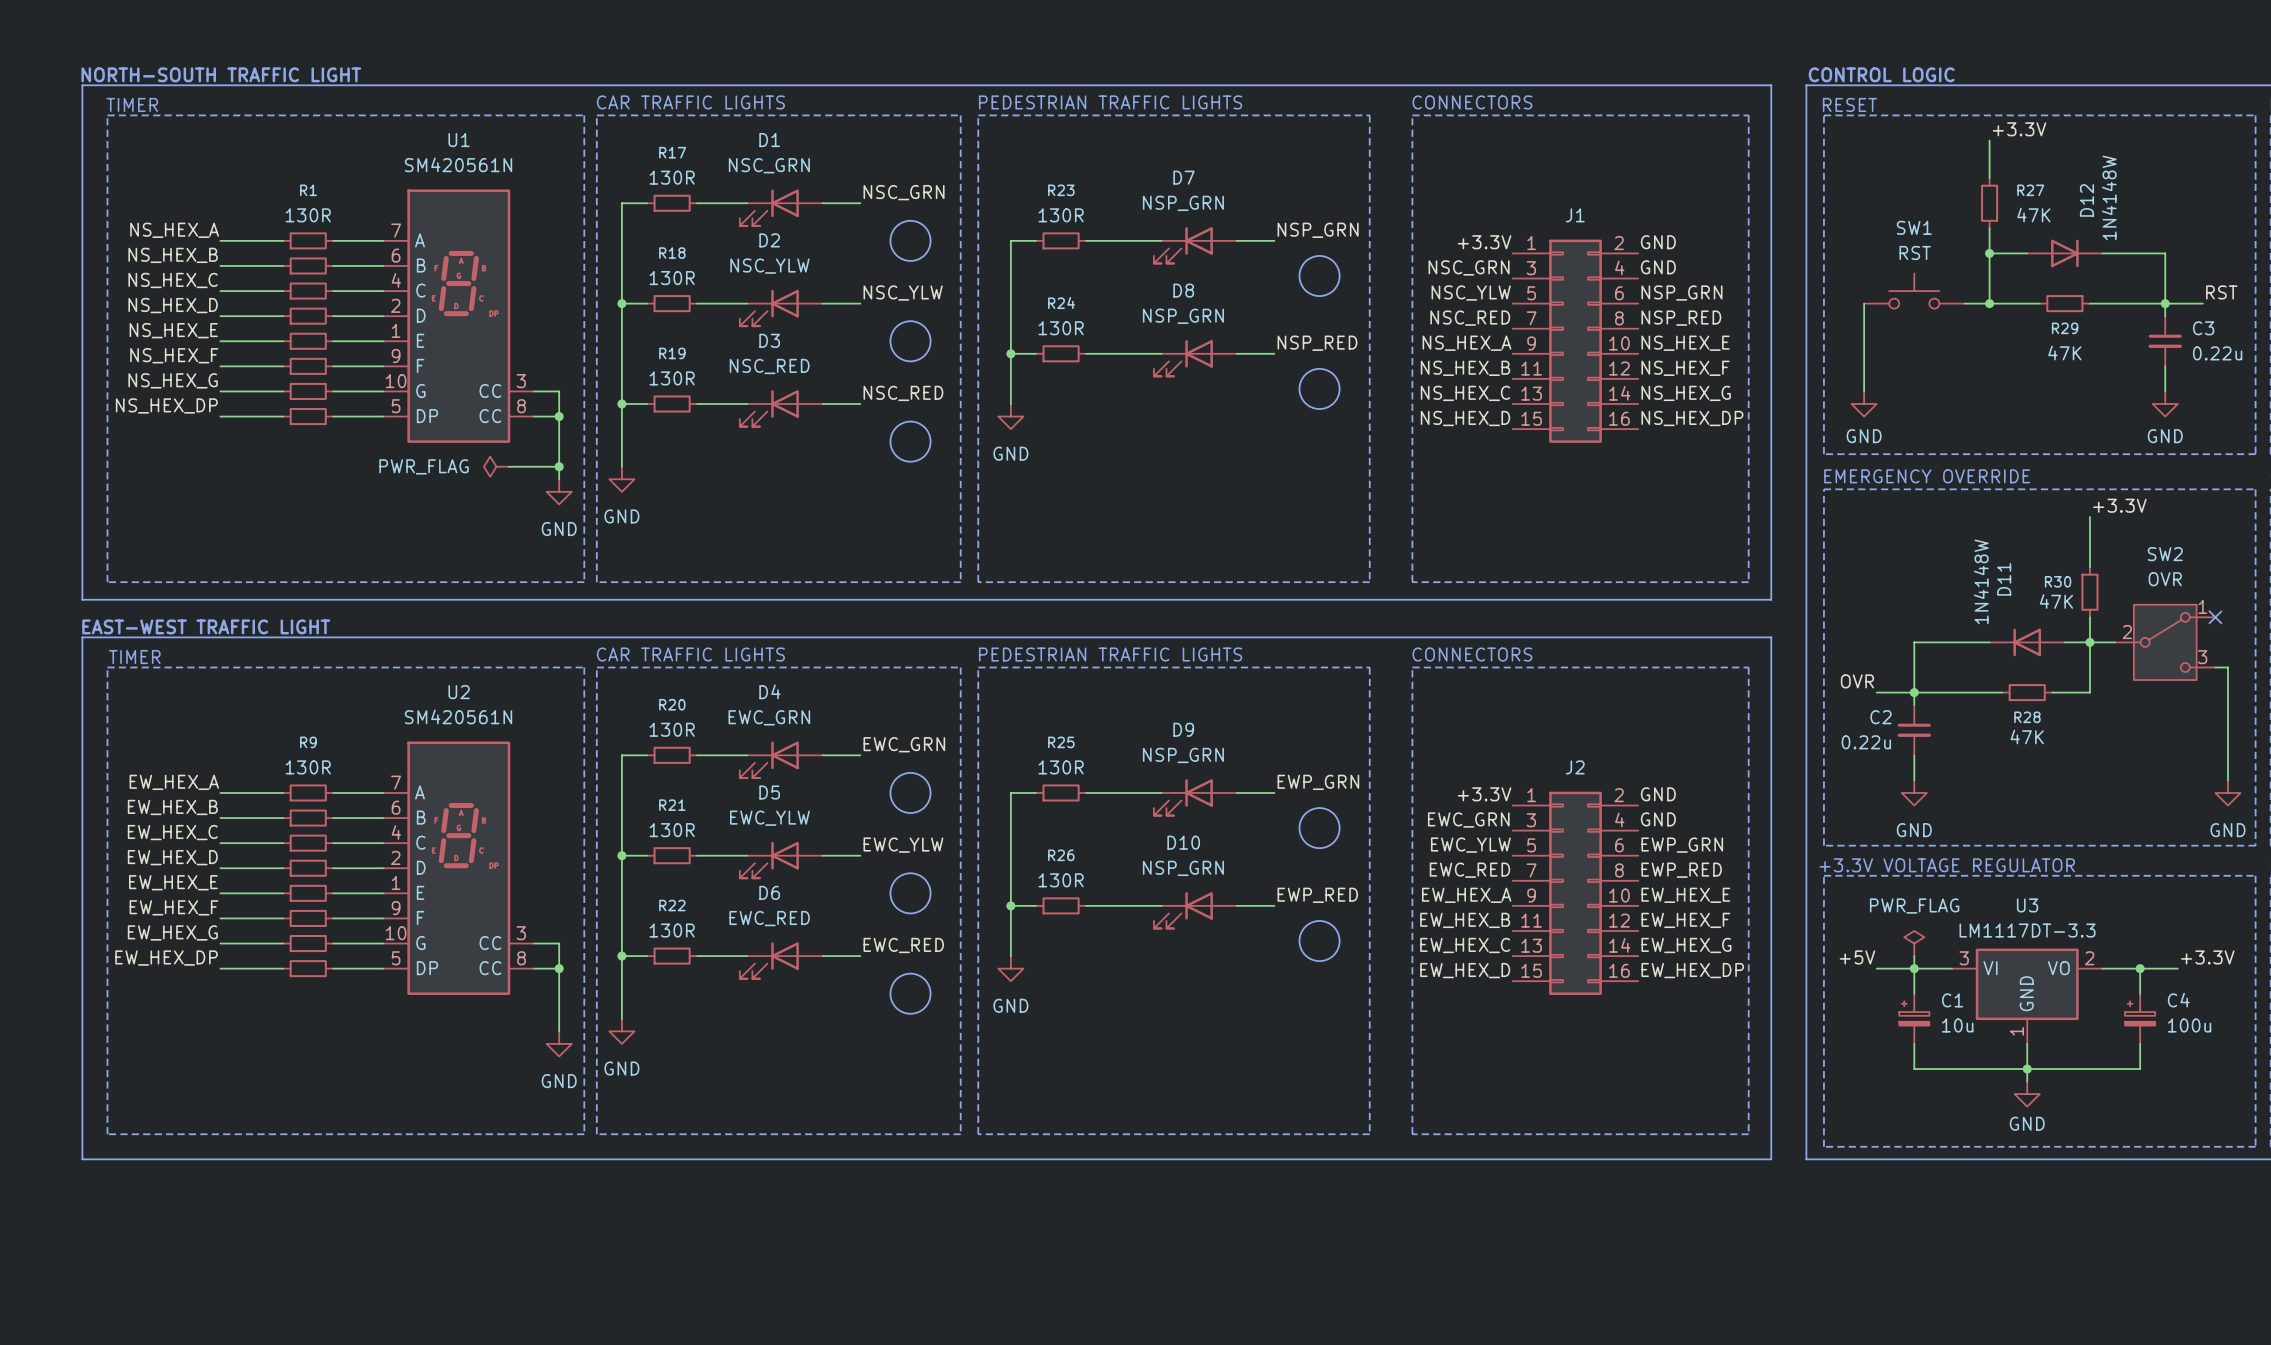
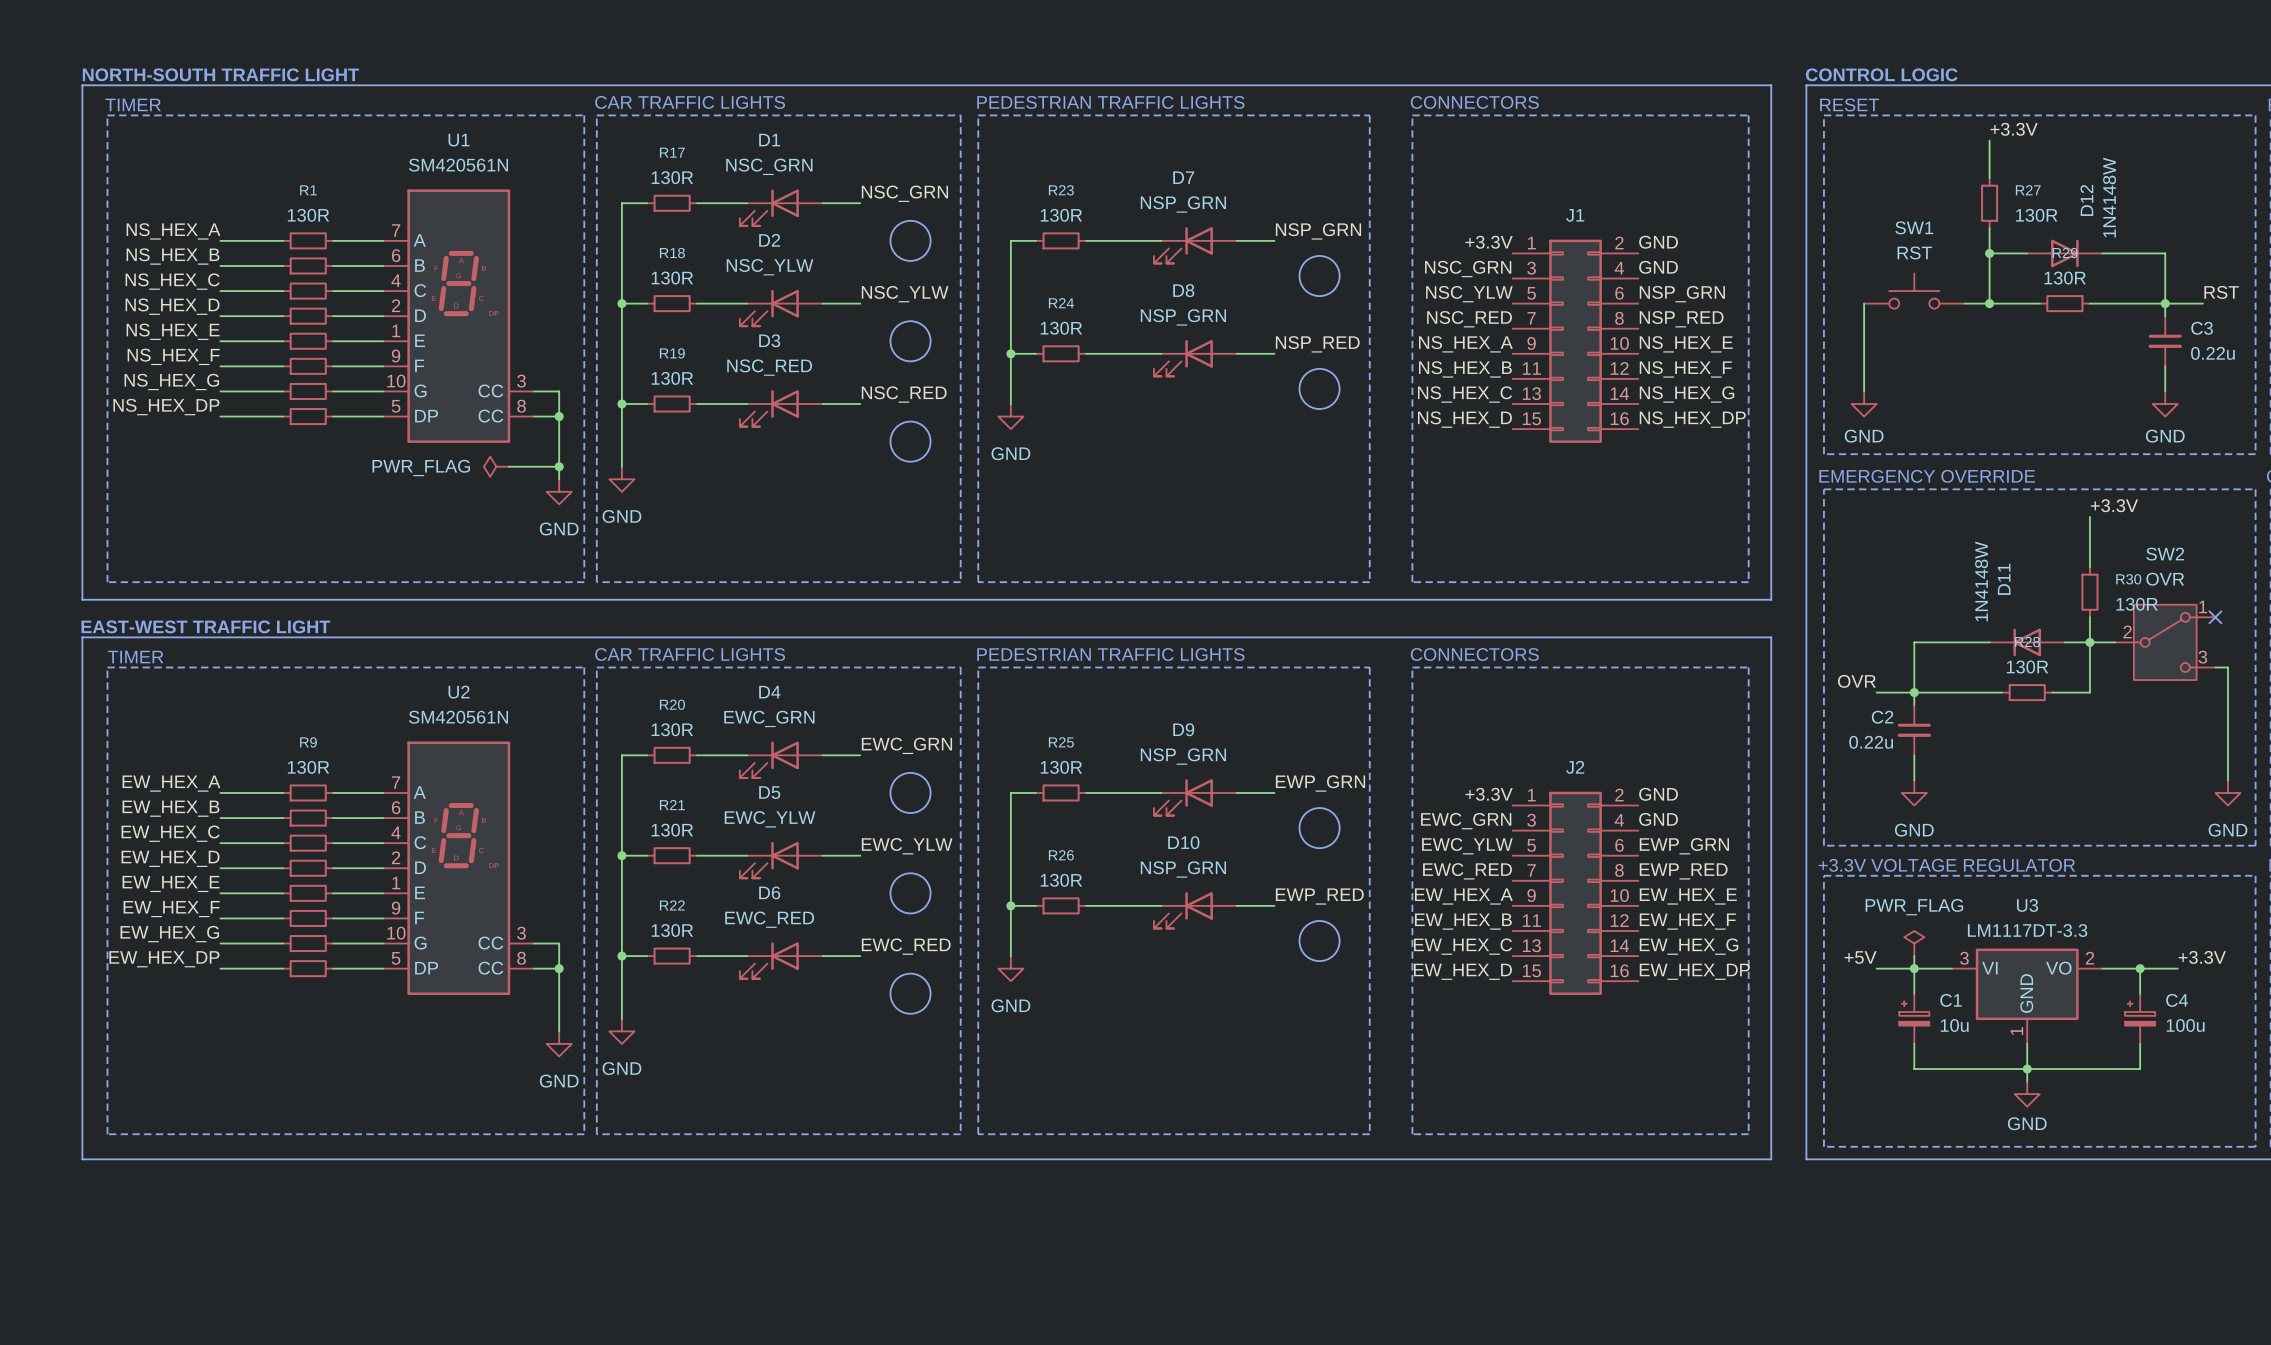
R27 value: 47K (2033, 215) -> 130R (2036, 215)
R29 name position: R29 (2065, 328) -> R29 (2065, 253)
R29 value: 47K (2064, 353) -> 130R (2065, 278)
R30 name position: R30 (2058, 581) -> R30 (2128, 579)
R30 value: 47K (2056, 601) -> 130R (2137, 604)
R28 name position: R28 (2027, 717) -> R28 (2027, 642)
R28 value: 47K (2027, 736) -> 130R (2027, 667)

